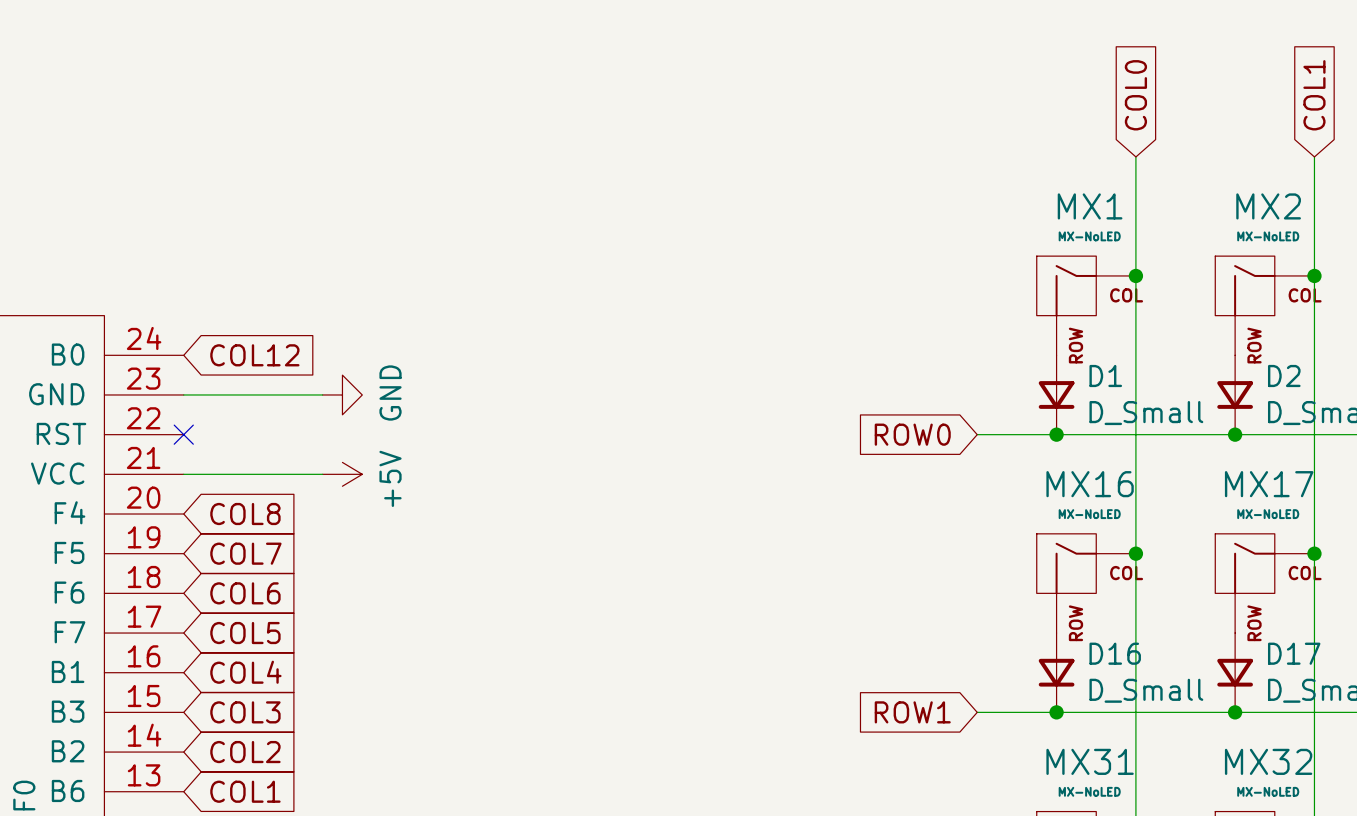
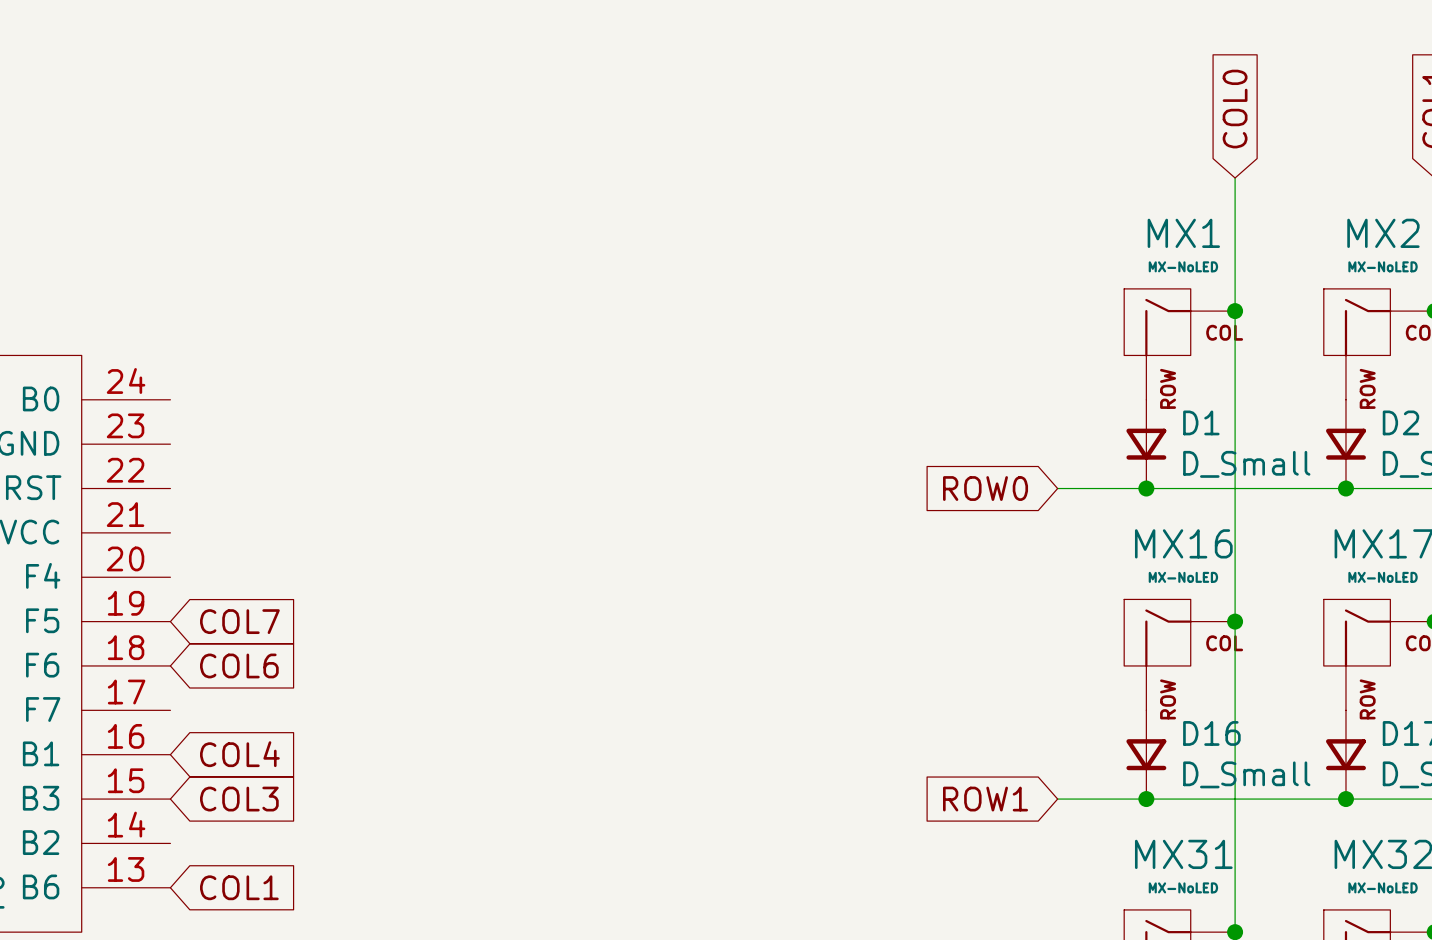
global label: COL12 (254, 355) -> none
wire: (183, 394) (322, 394) -> none
power symbol: GND (342, 394) -> none
no-connect mark: (183, 434) -> none
wire: (183, 474) (322, 474) -> none
power symbol: +5V (342, 474) -> none
global label: COL8 (245, 514) -> none
global label: COL5 (245, 633) -> none
global label: COL2 (245, 752) -> none

